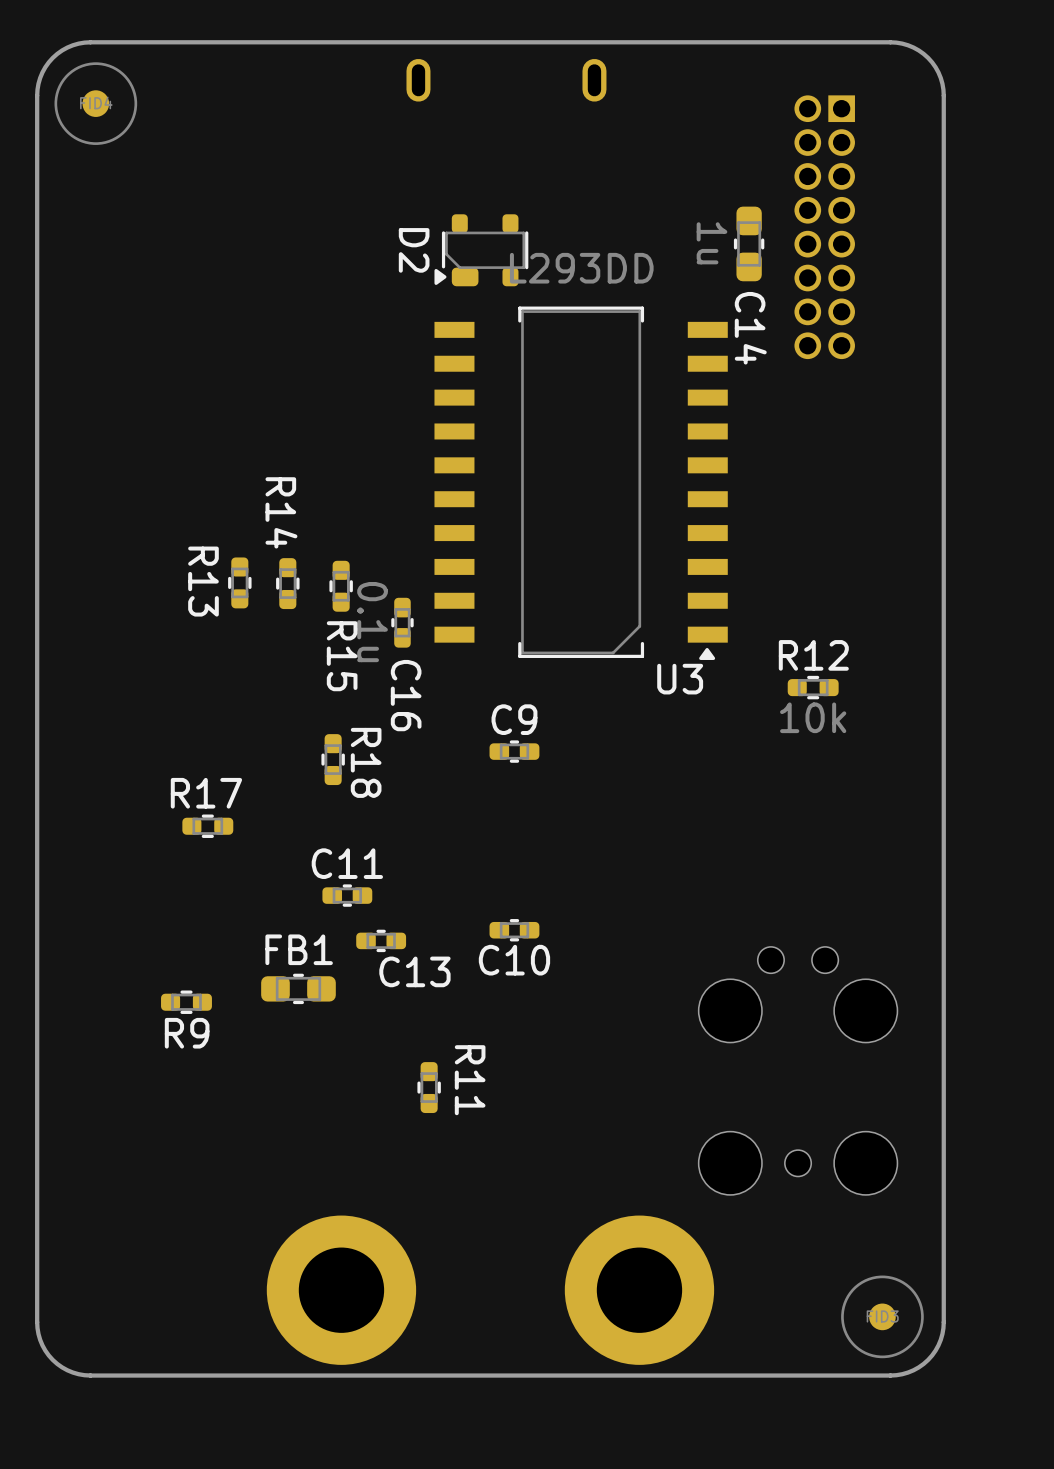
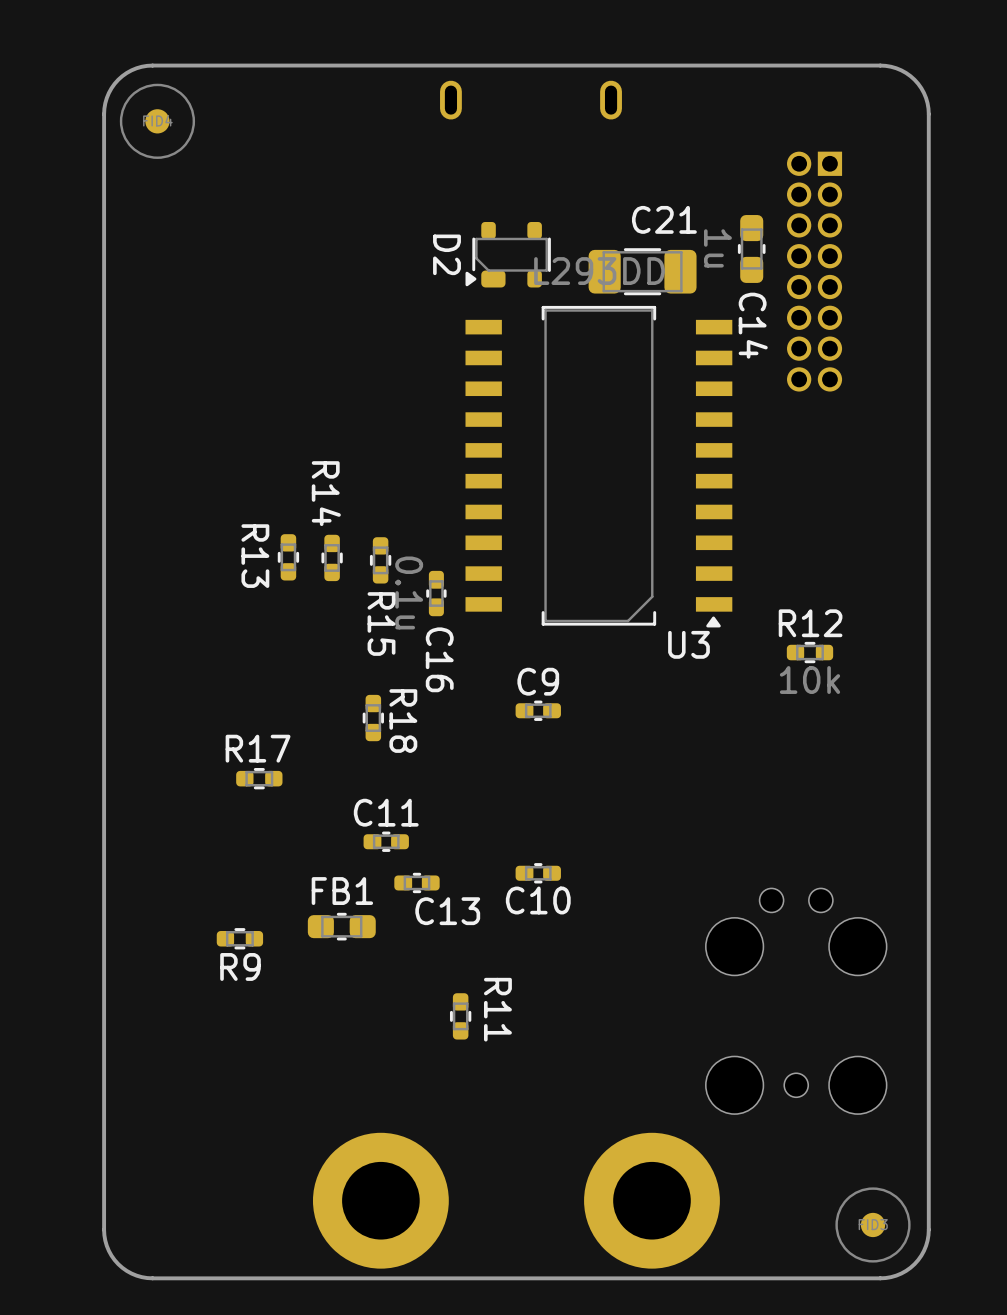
part position: (824, 227) -> (814, 271)
C21: none -> (642, 271)

